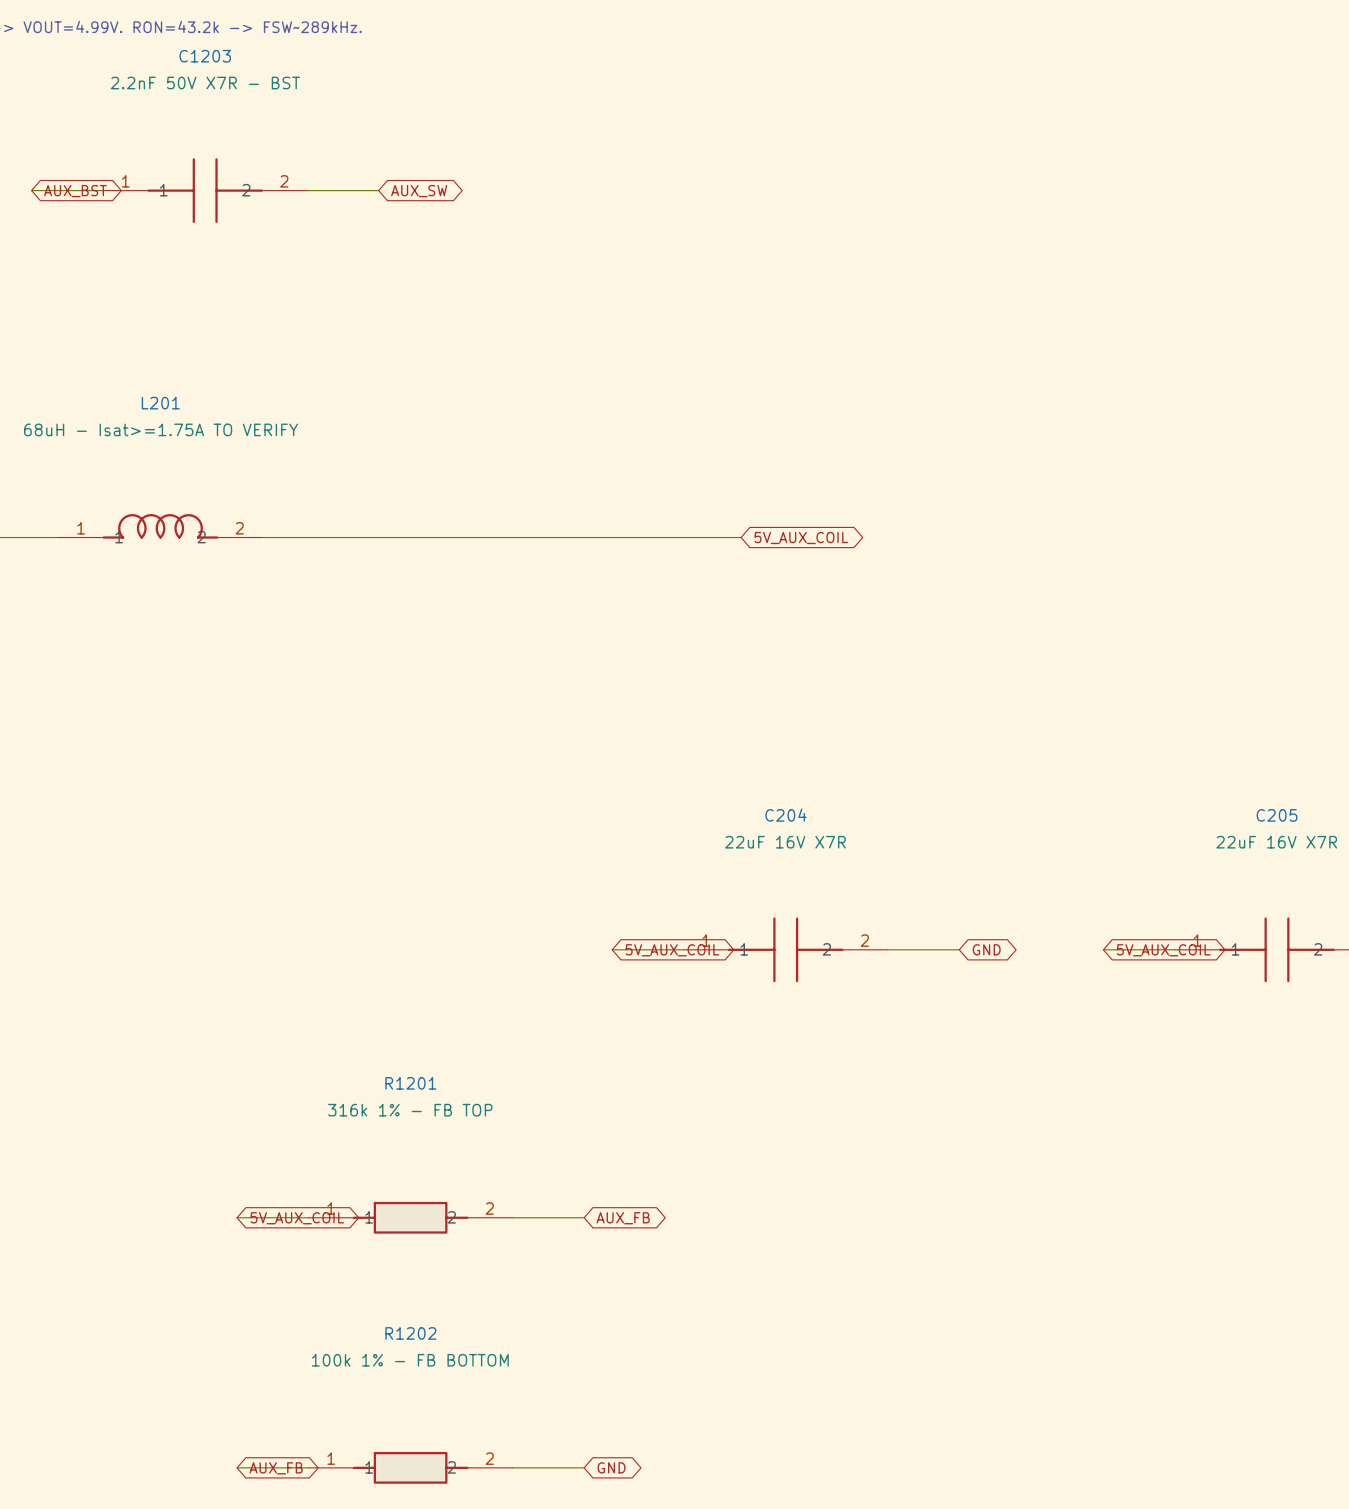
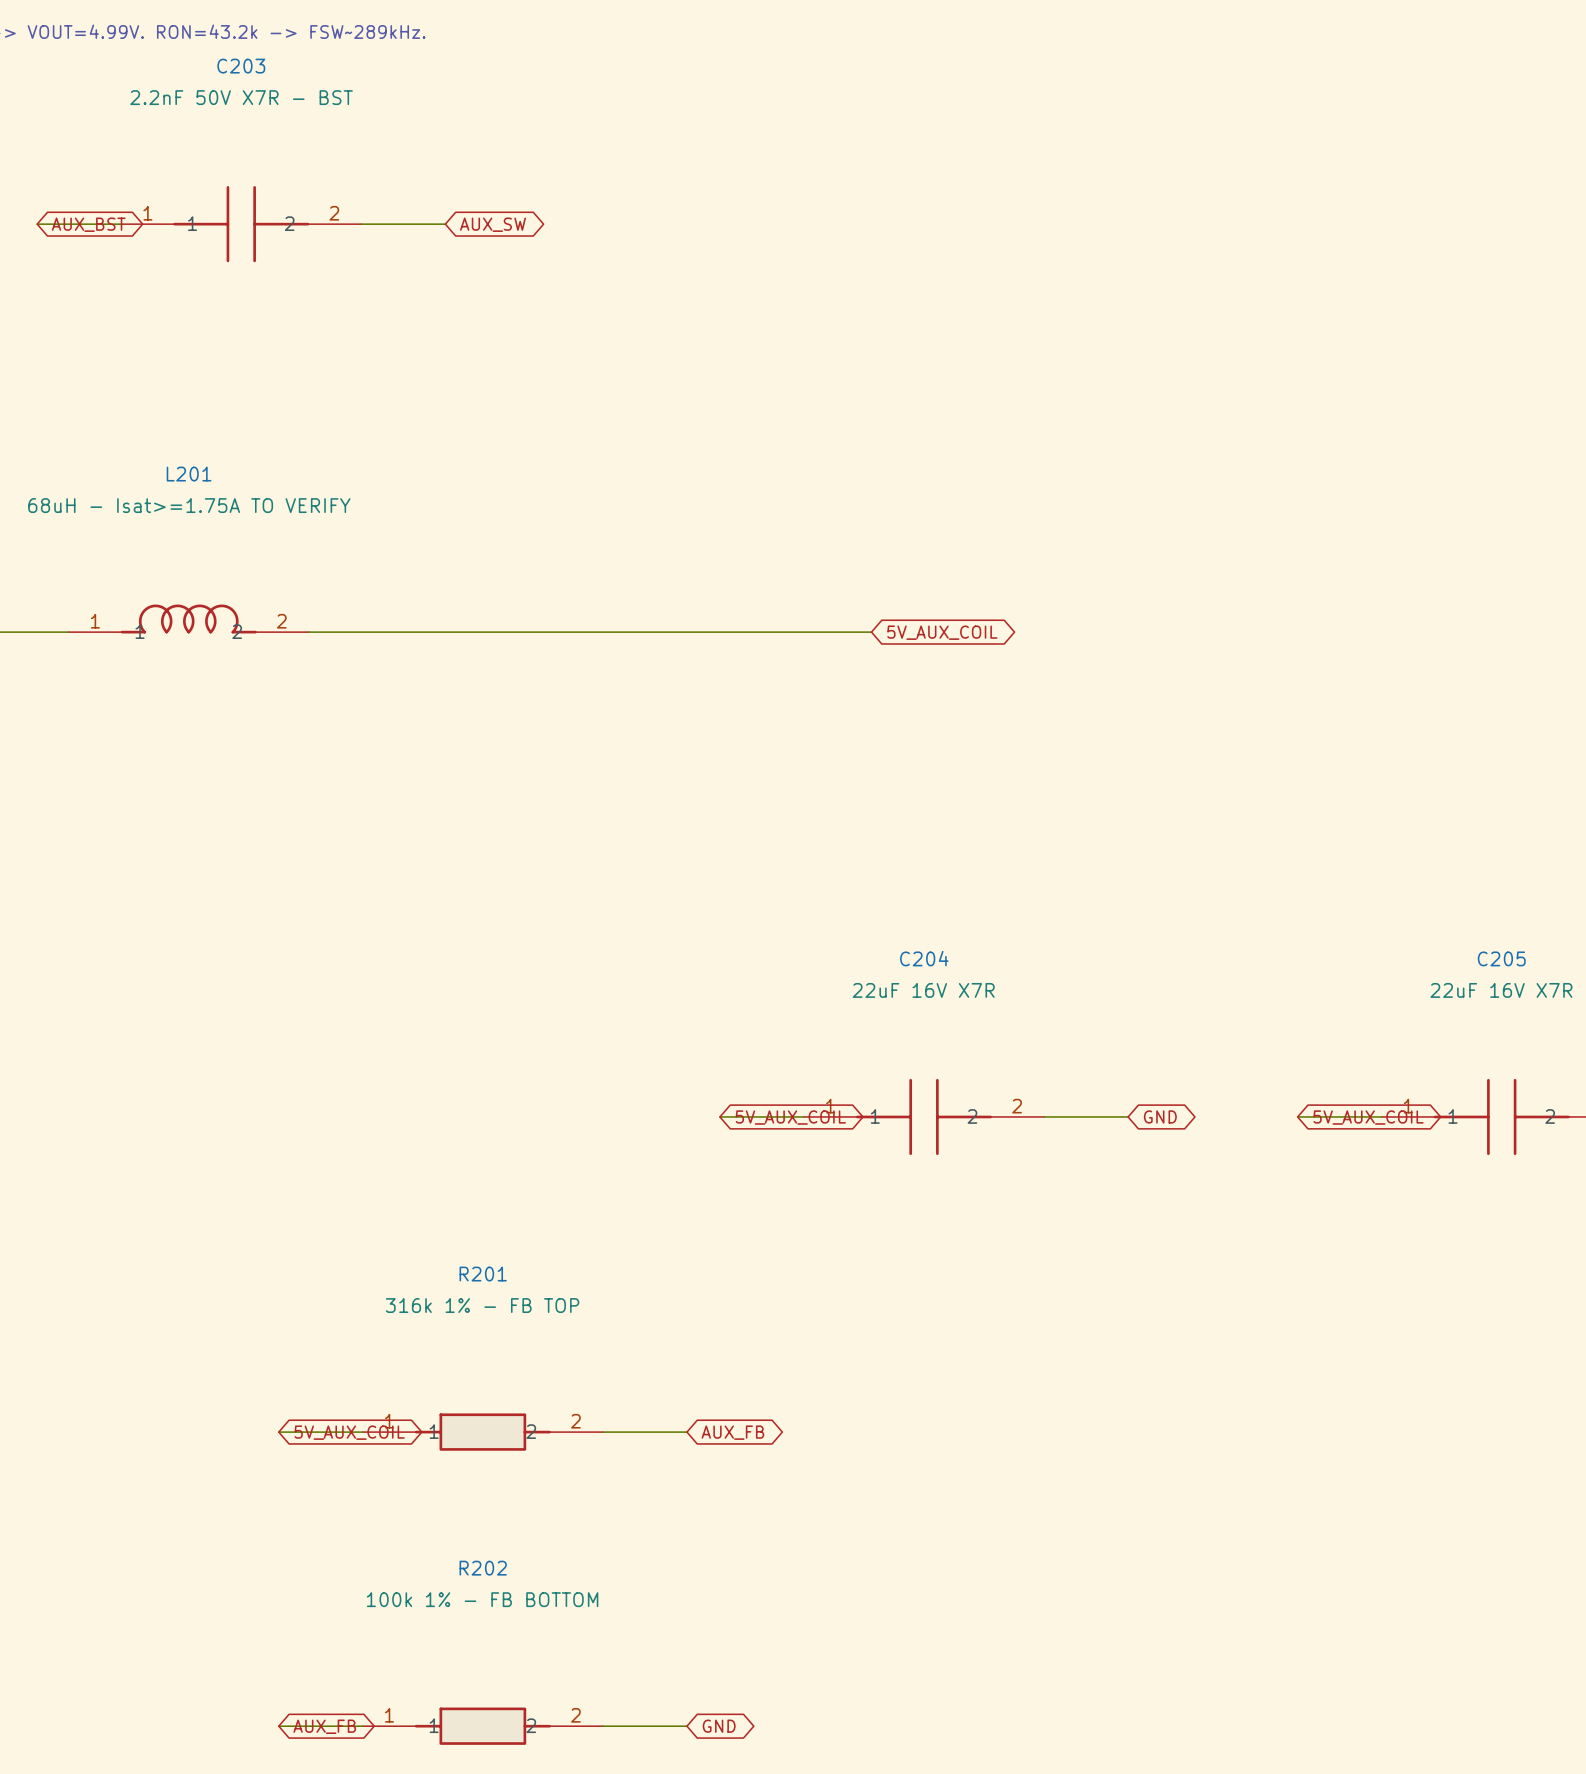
C1203 name: C1203 (205, 56) -> C203 (241, 66)
R1201 name: R1201 (410, 1083) -> R201 (483, 1274)
R1202 name: R1202 (410, 1333) -> R202 (483, 1568)

